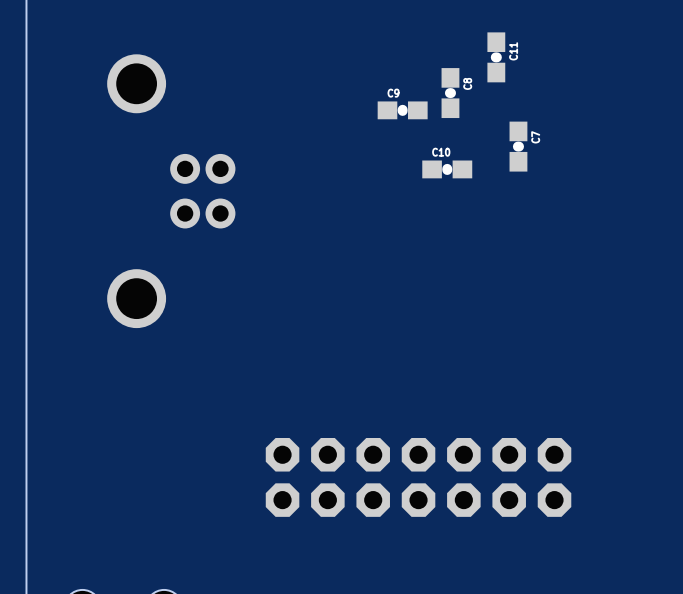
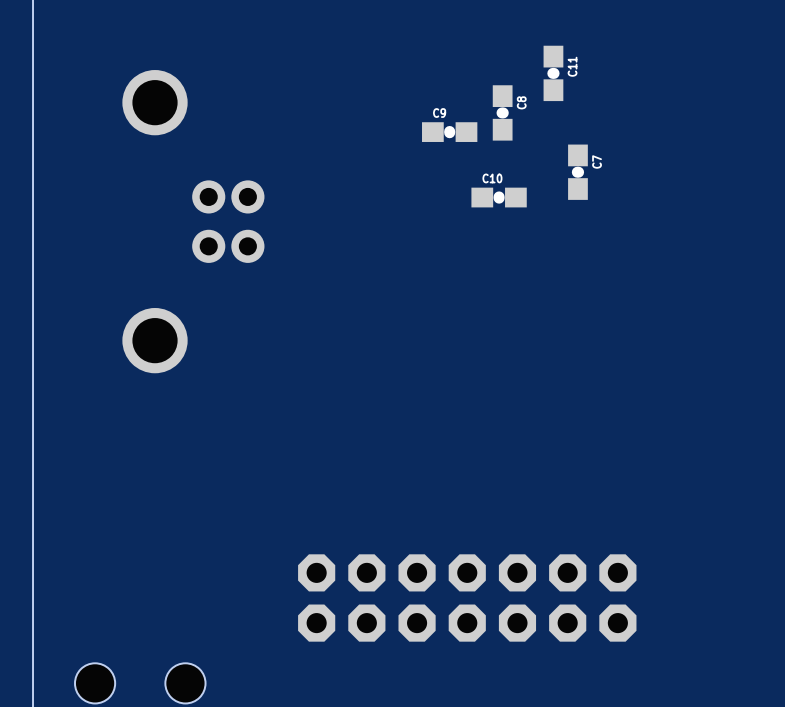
part position: (418, 477) -> (467, 597)

